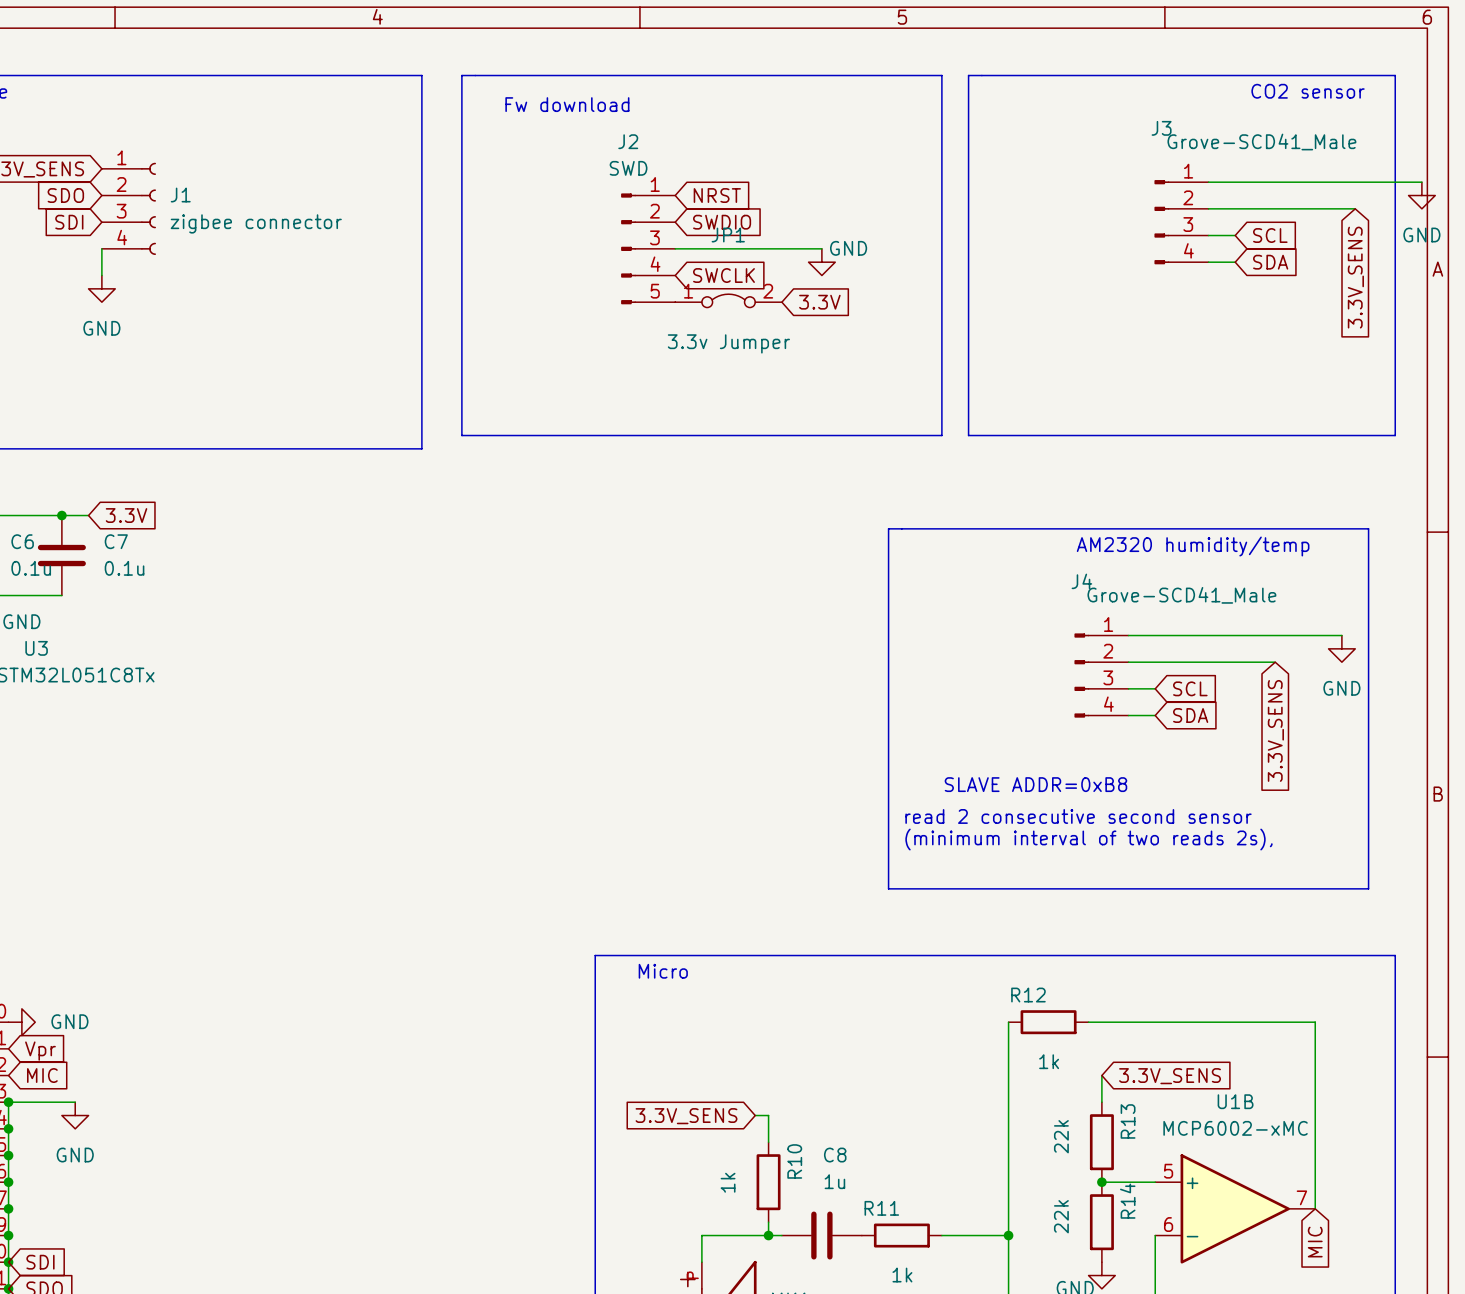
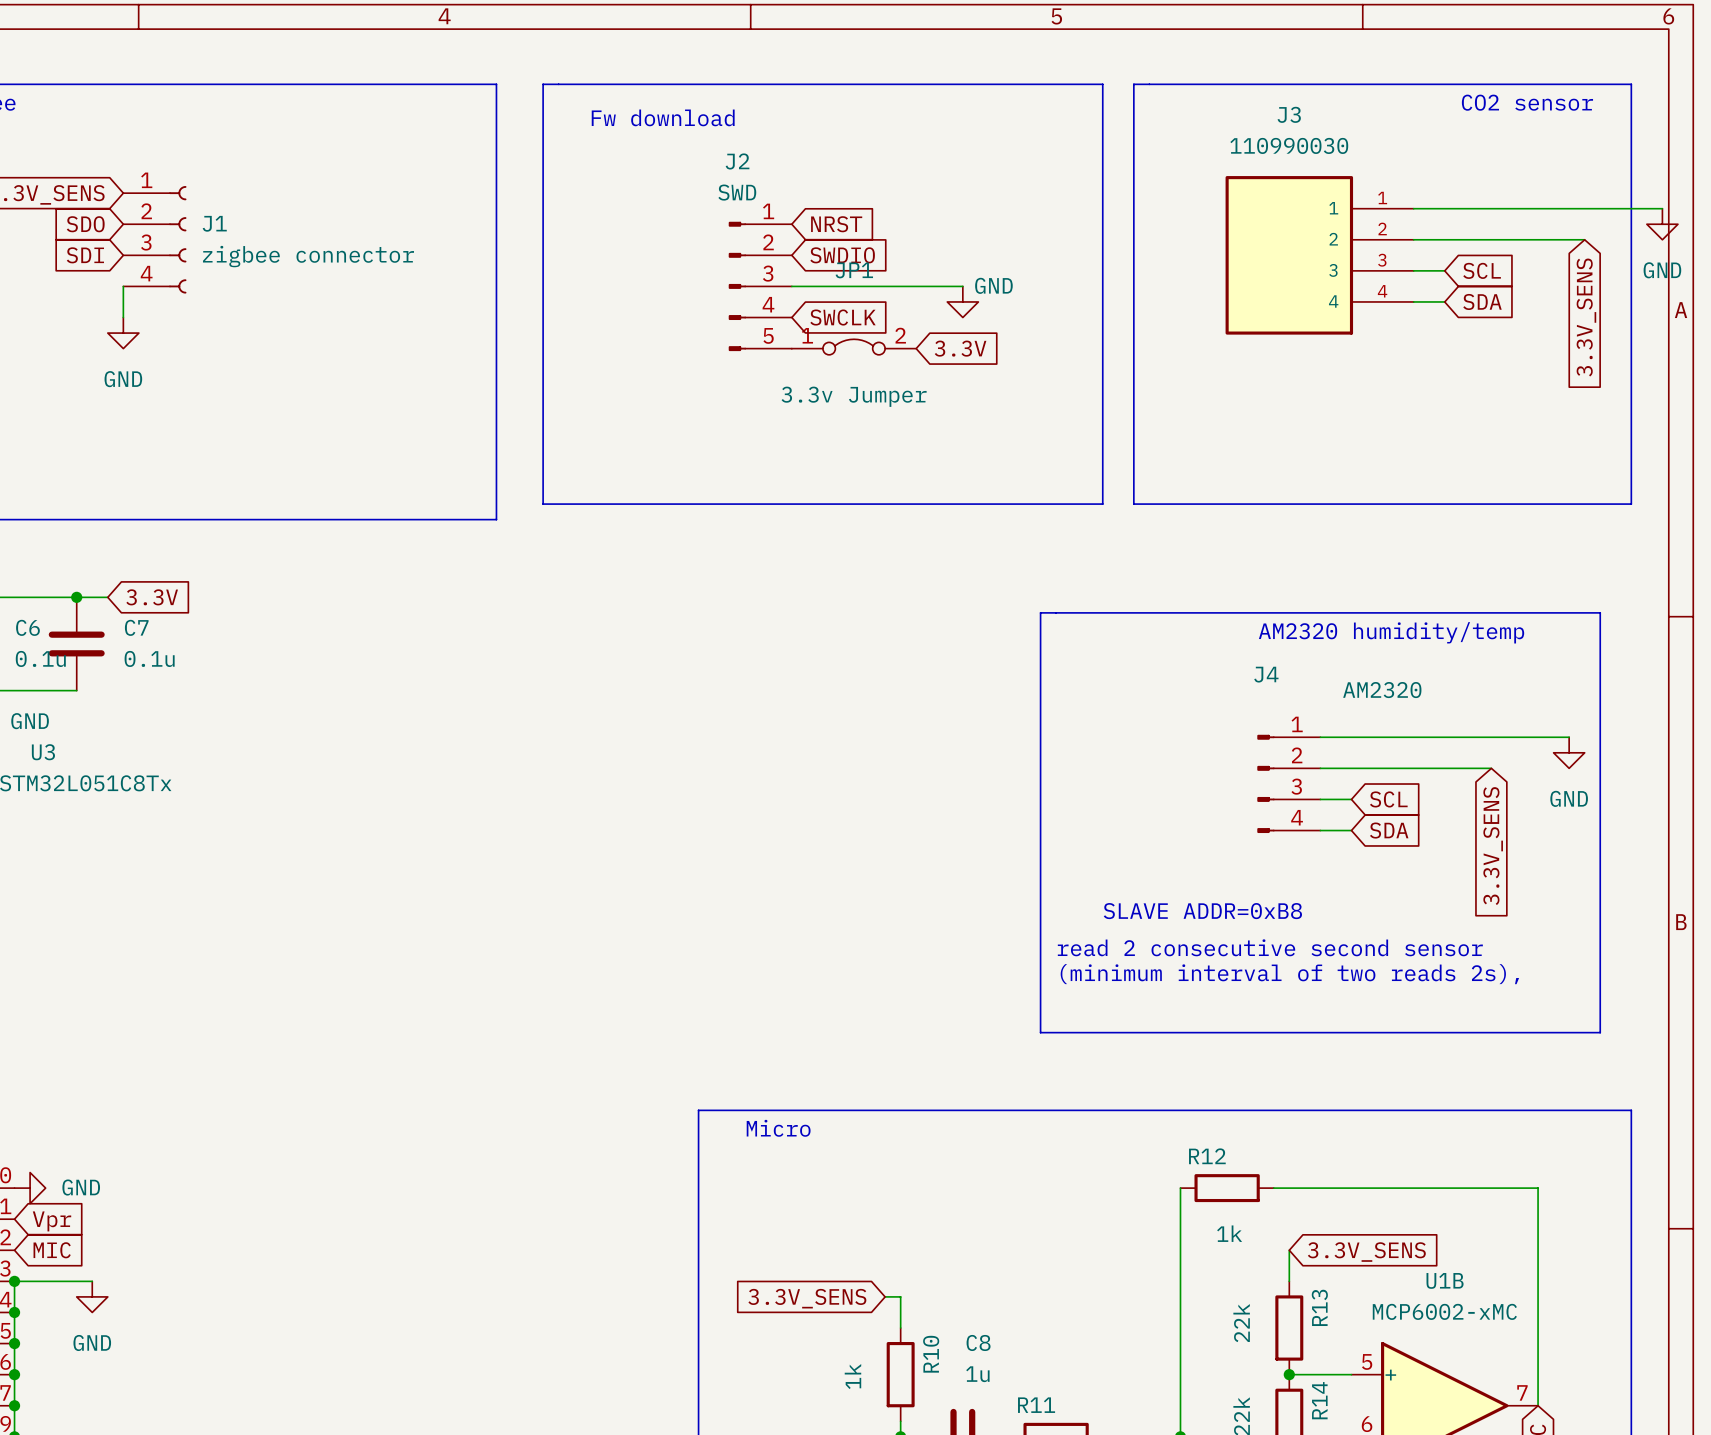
J3 name position: J3 (1161, 128) -> J3 (1289, 114)
J3 value: Grove-SCD41_Male (1261, 142) -> 110990030 (1289, 145)
J3 symbol: [1154, 180, 1209, 265] -> [1225, 176, 1414, 335]
J4 value: Grove-SCD41_Male (1181, 595) -> AM2320 (1382, 690)

